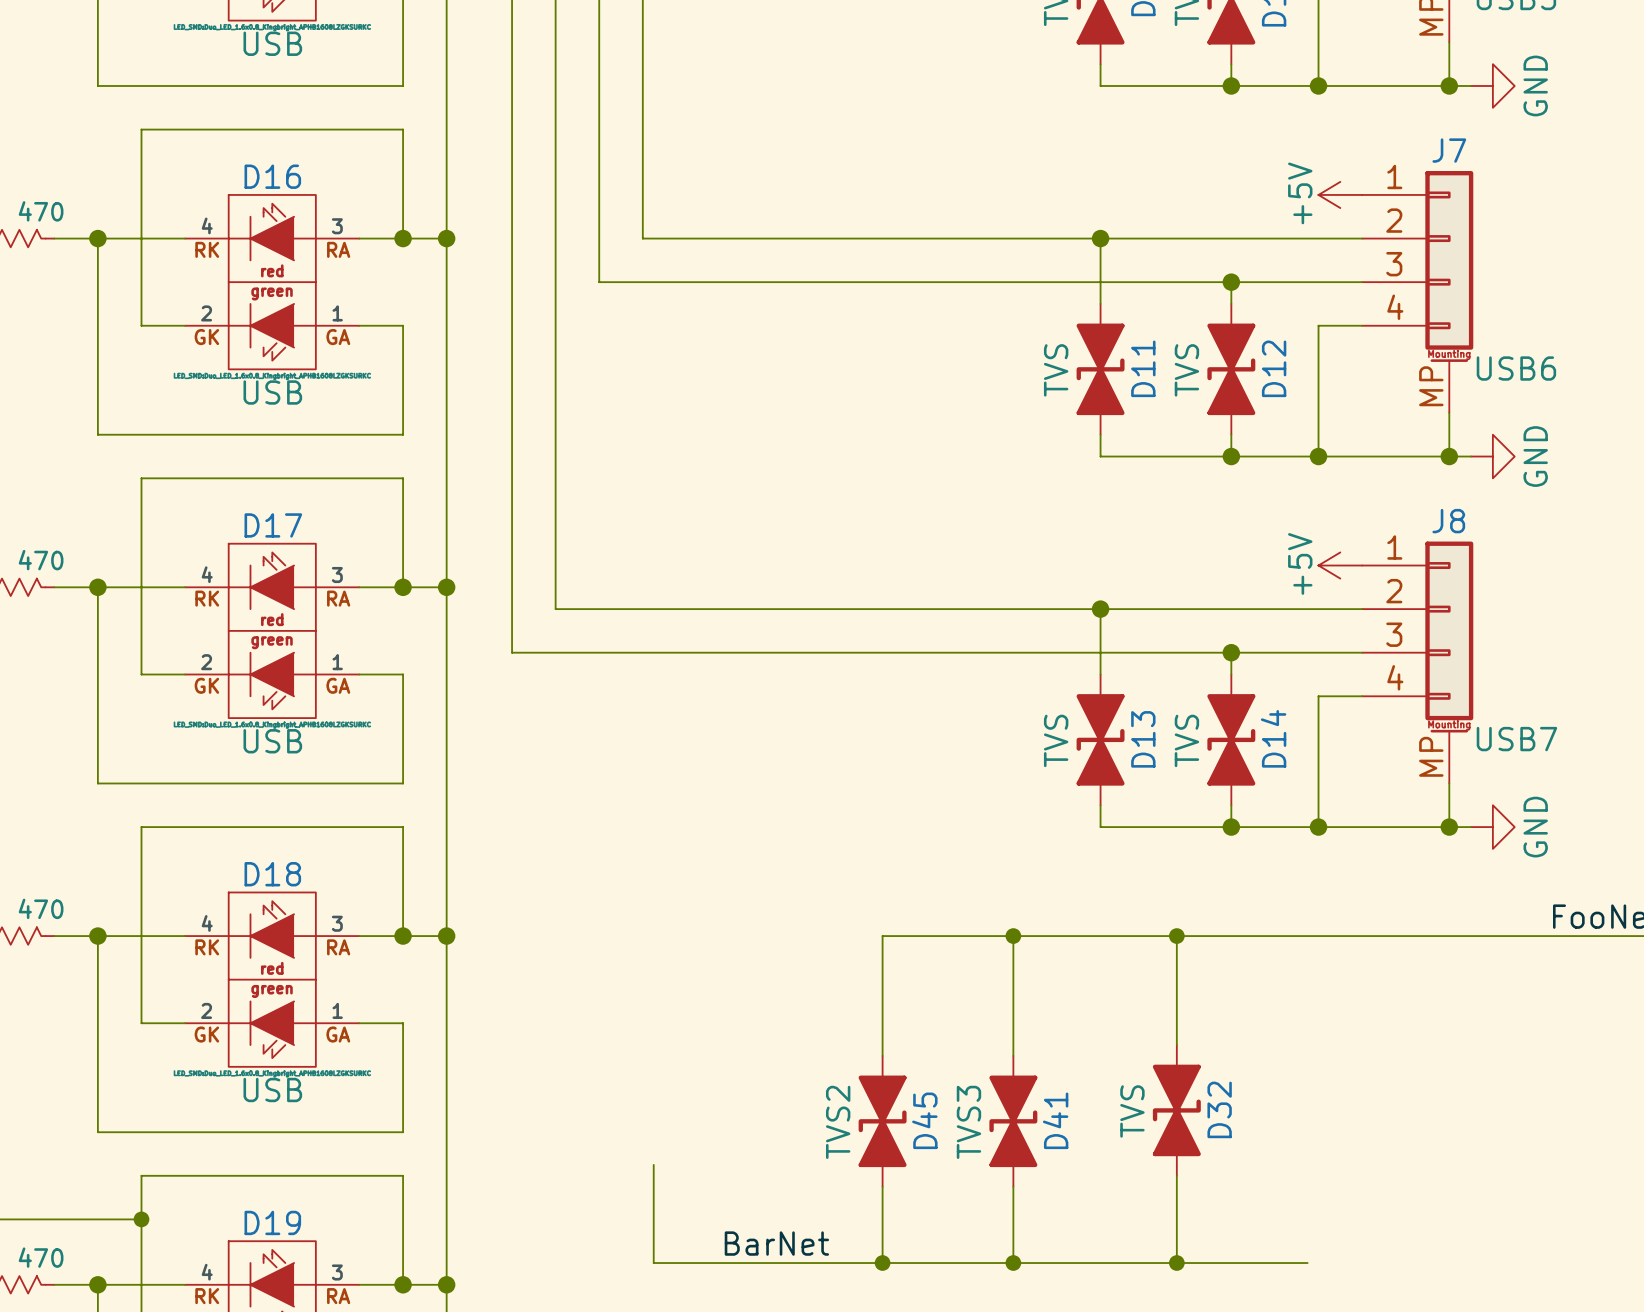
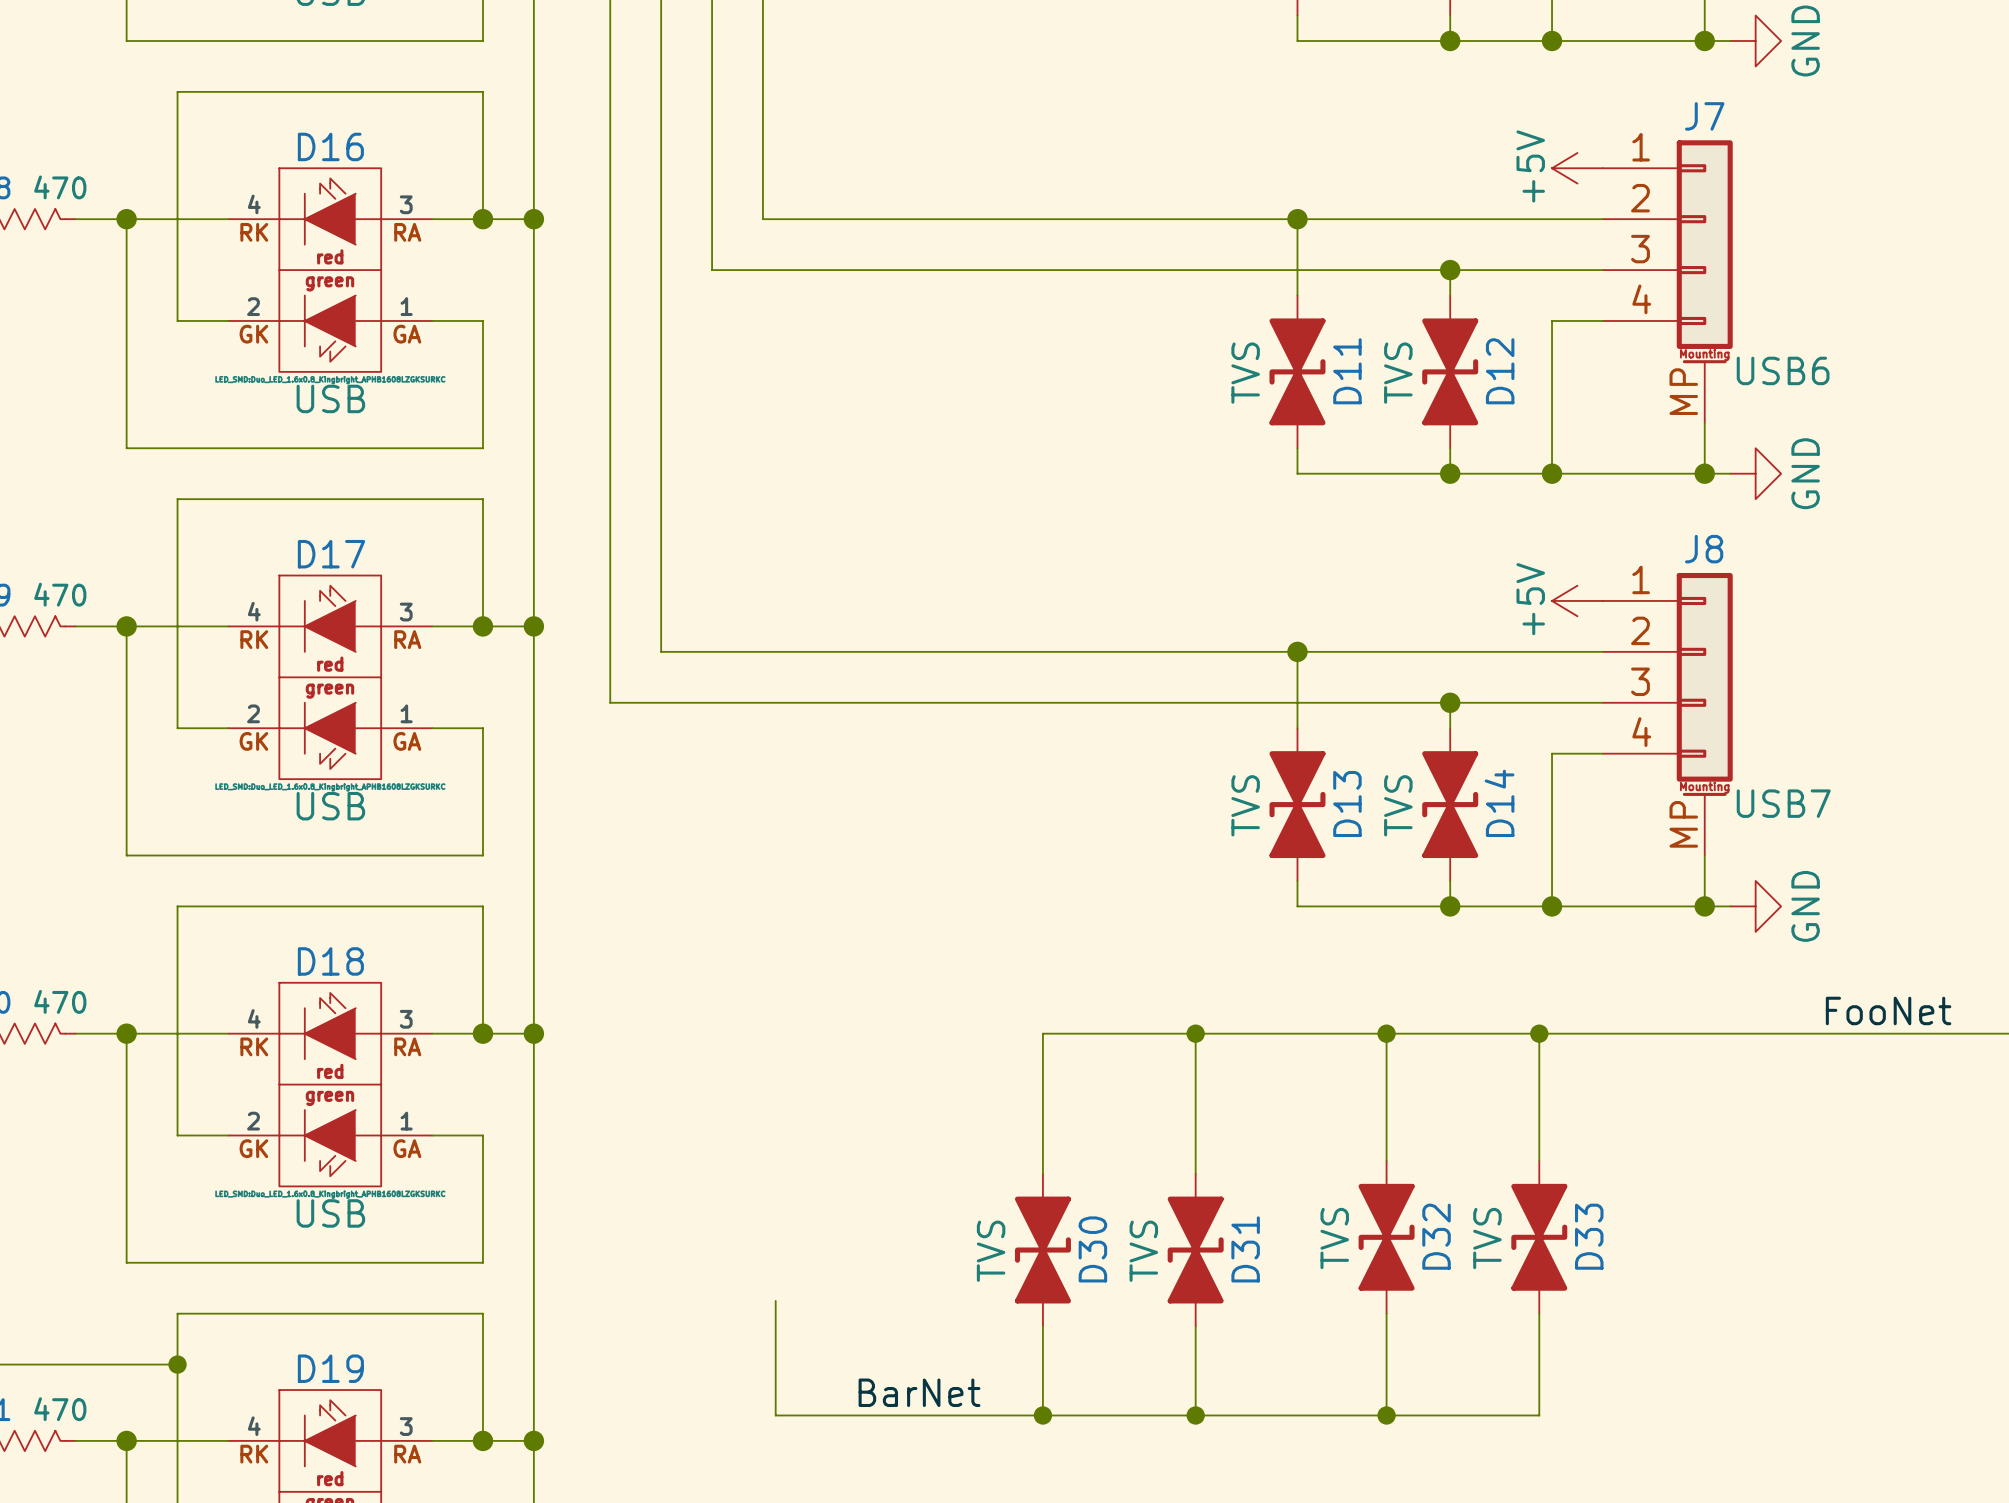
wire: none -> (1539, 1033) (1539, 1160)
junction: none -> (1539, 1033)
D33: none -> TVS (1539, 1237)
D45 name: D45 (924, 1120) -> D30 (1092, 1249)
D41 name: D41 (1055, 1120) -> D31 (1245, 1249)
D45 value: TVS2 (838, 1122) -> TVS (991, 1251)
D41 value: TVS3 (968, 1122) -> TVS (1143, 1251)
wire: none -> (1539, 1313) (1539, 1415)

